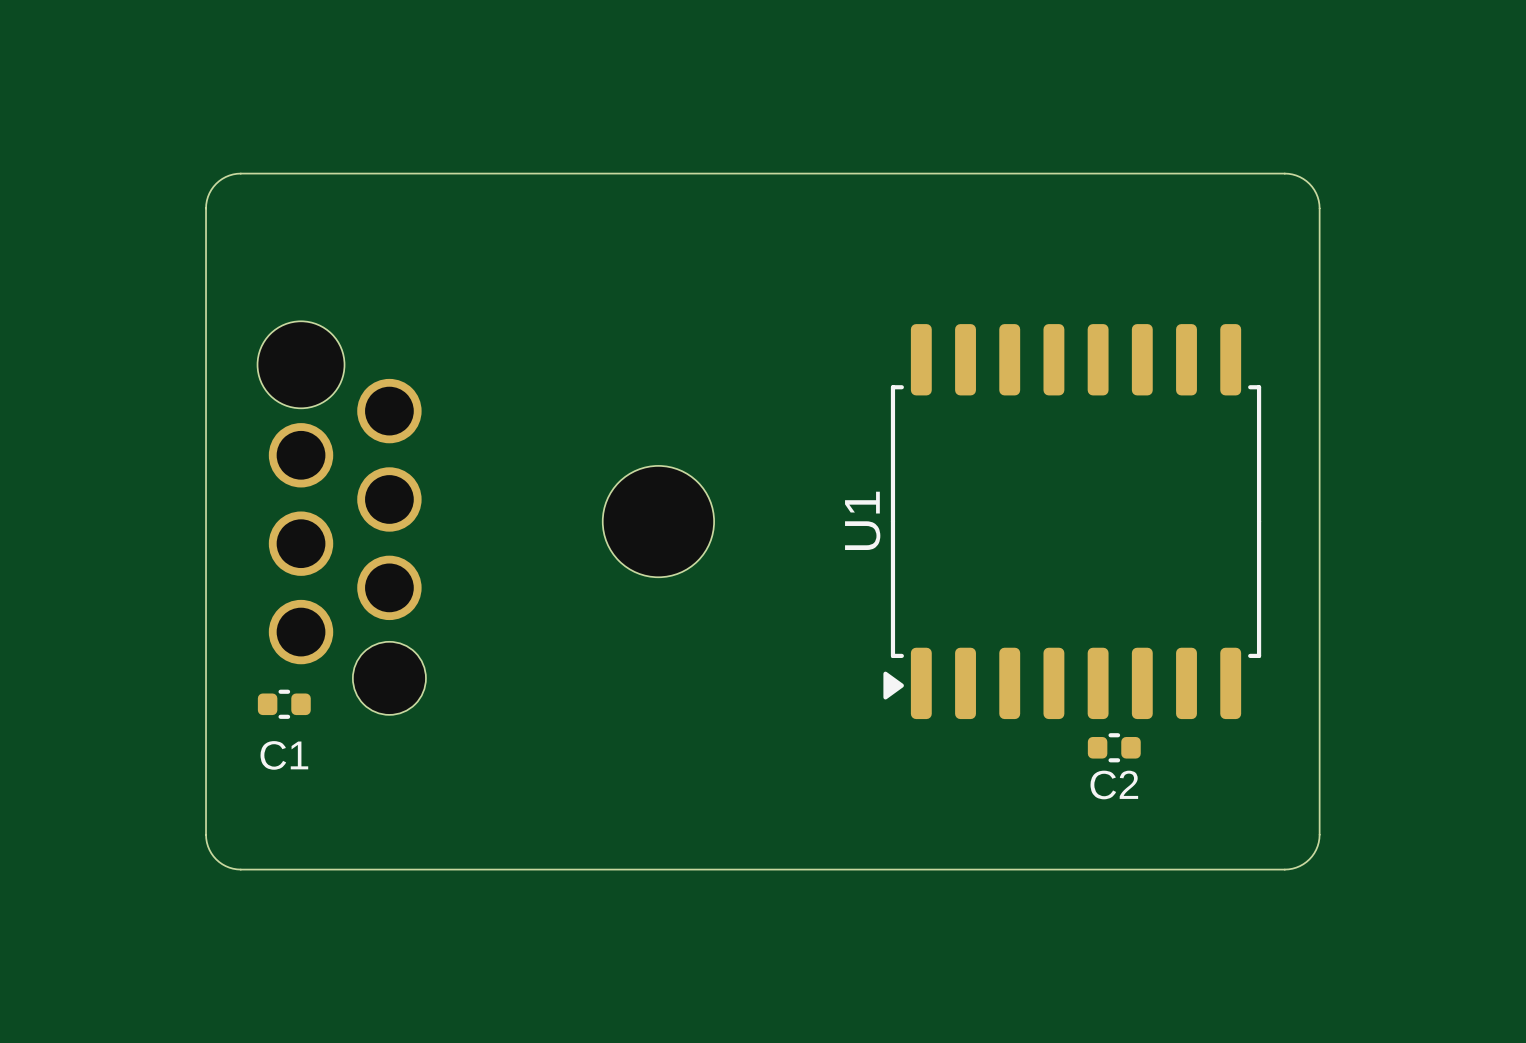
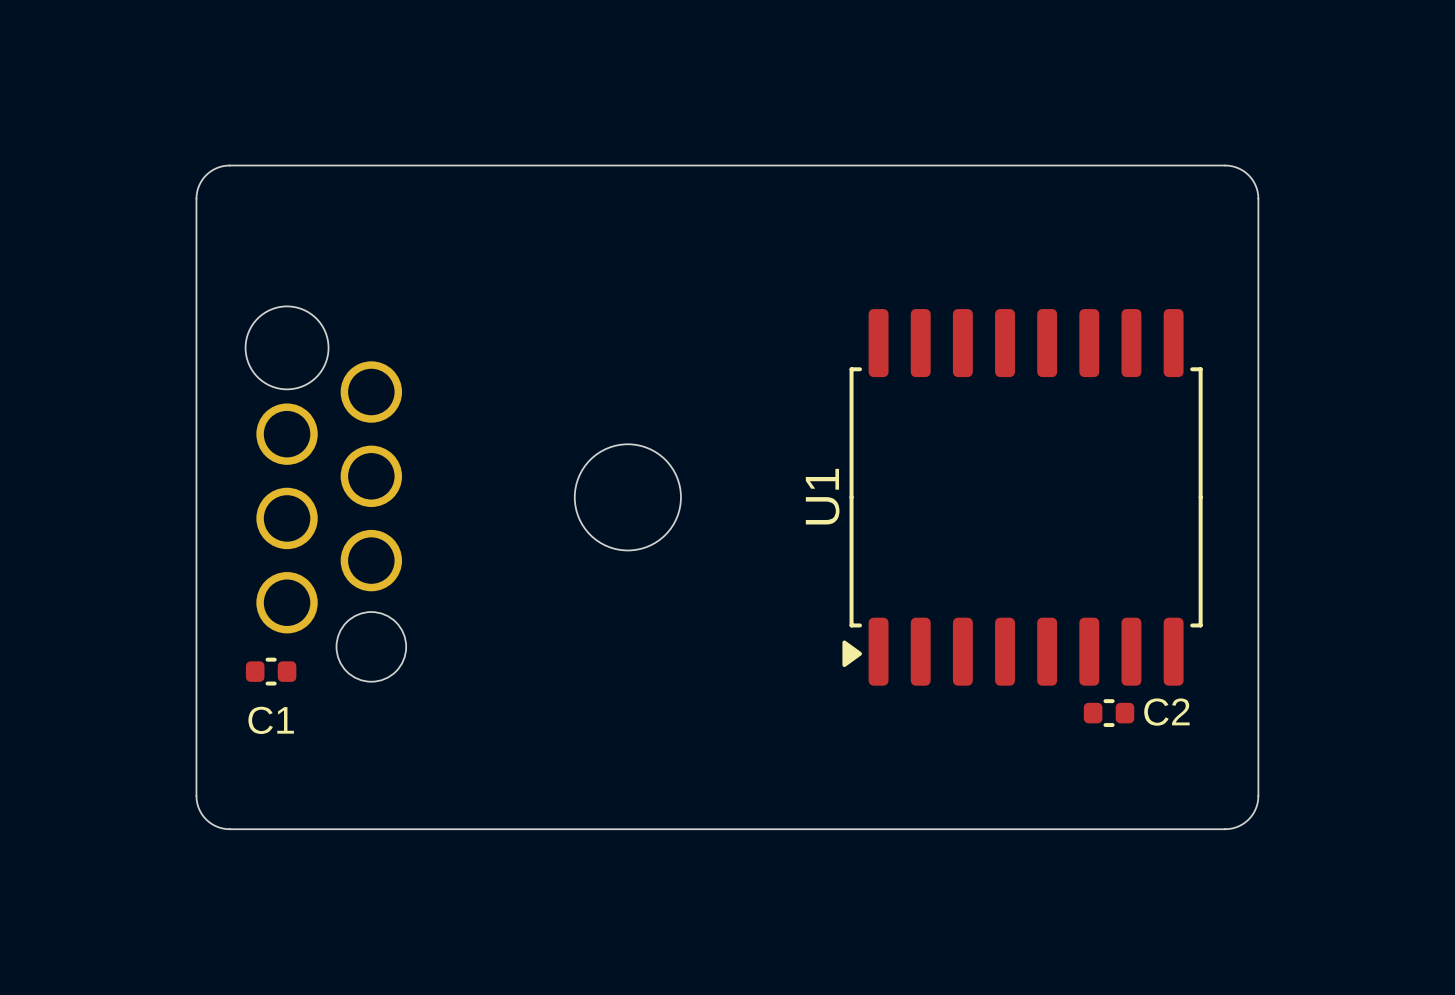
C2 position: (1114, 747) -> (1109, 713)
C2 name position: C2 (1114, 785) -> C2 (1166, 712)

